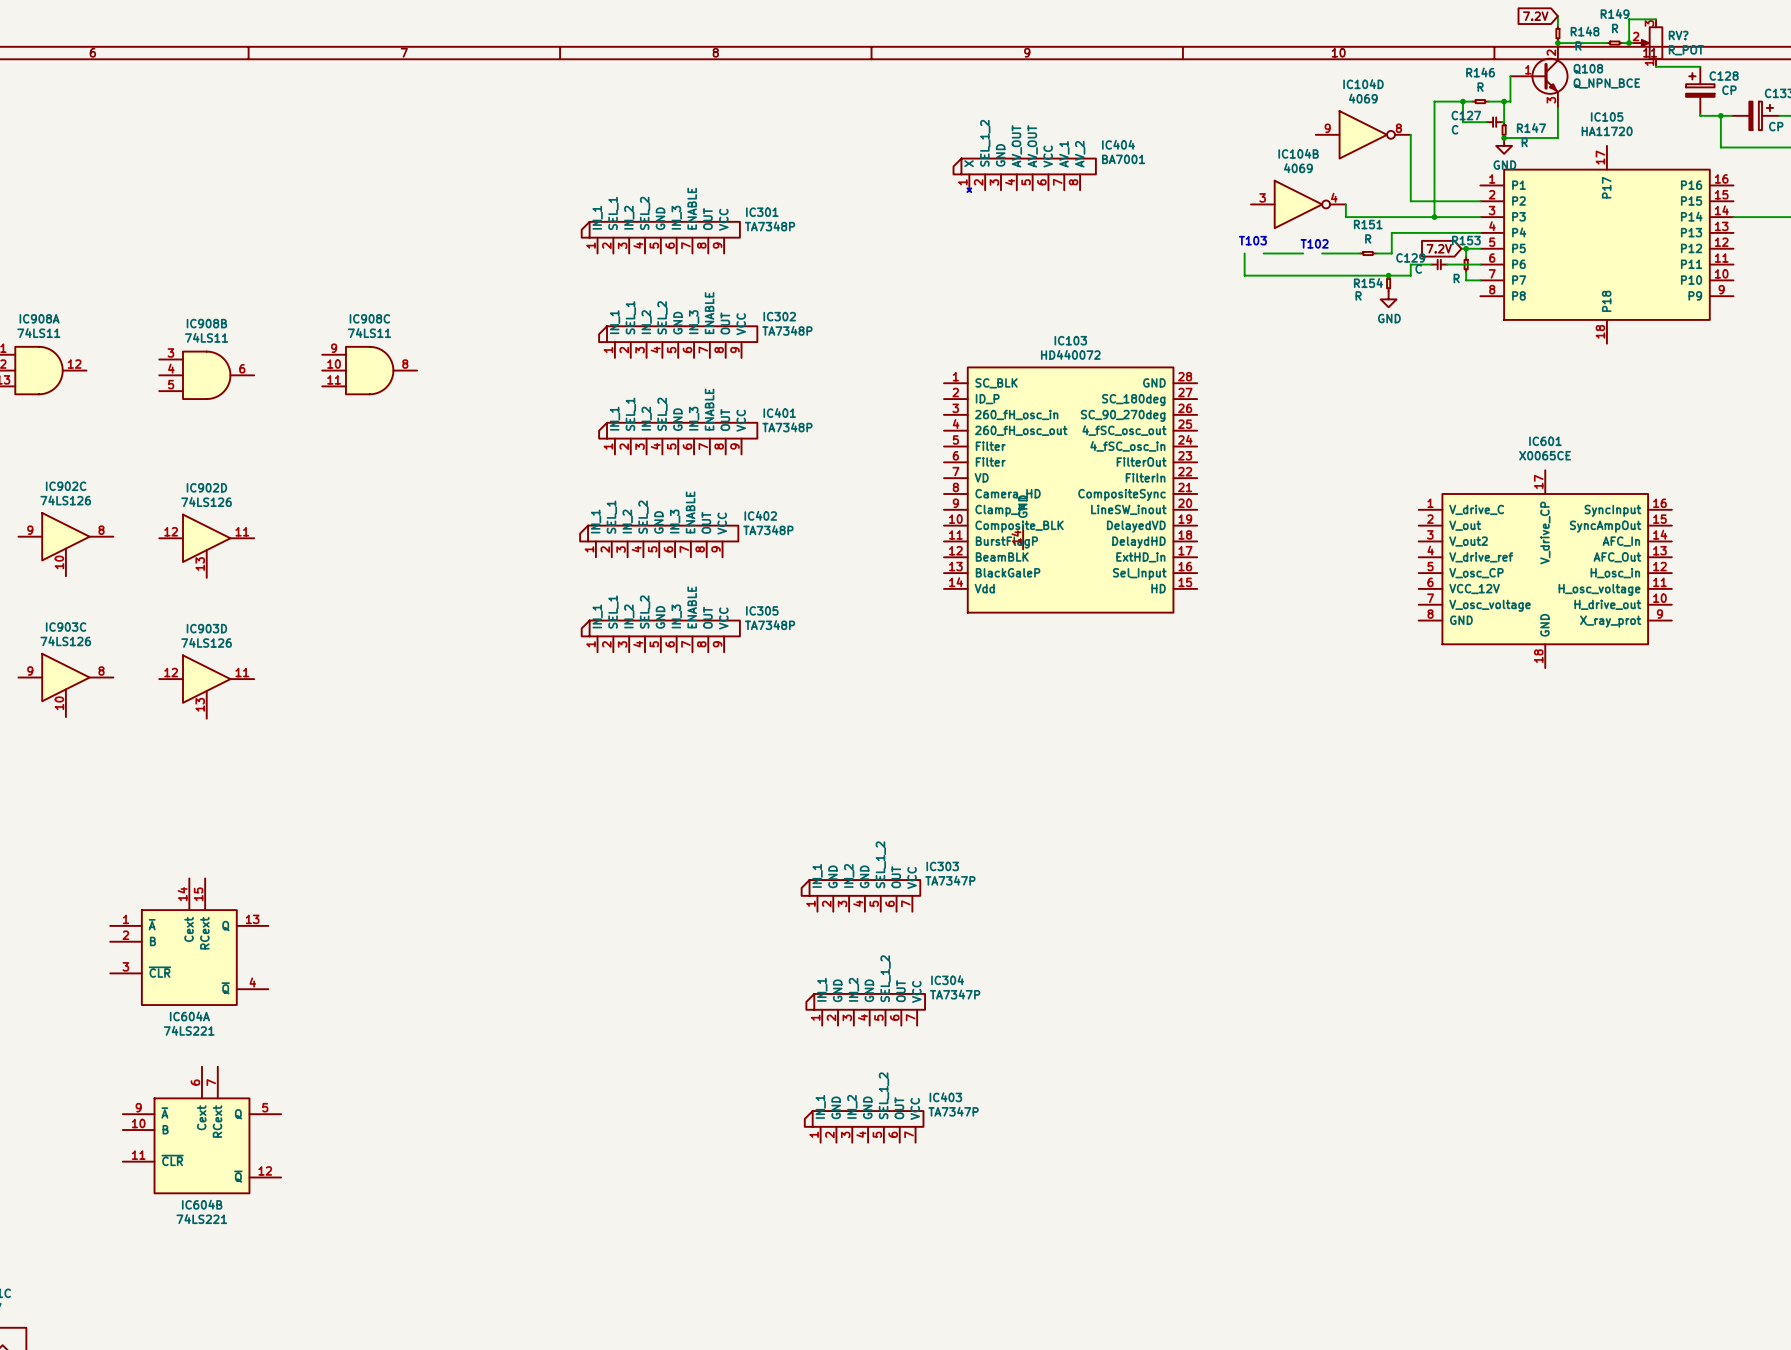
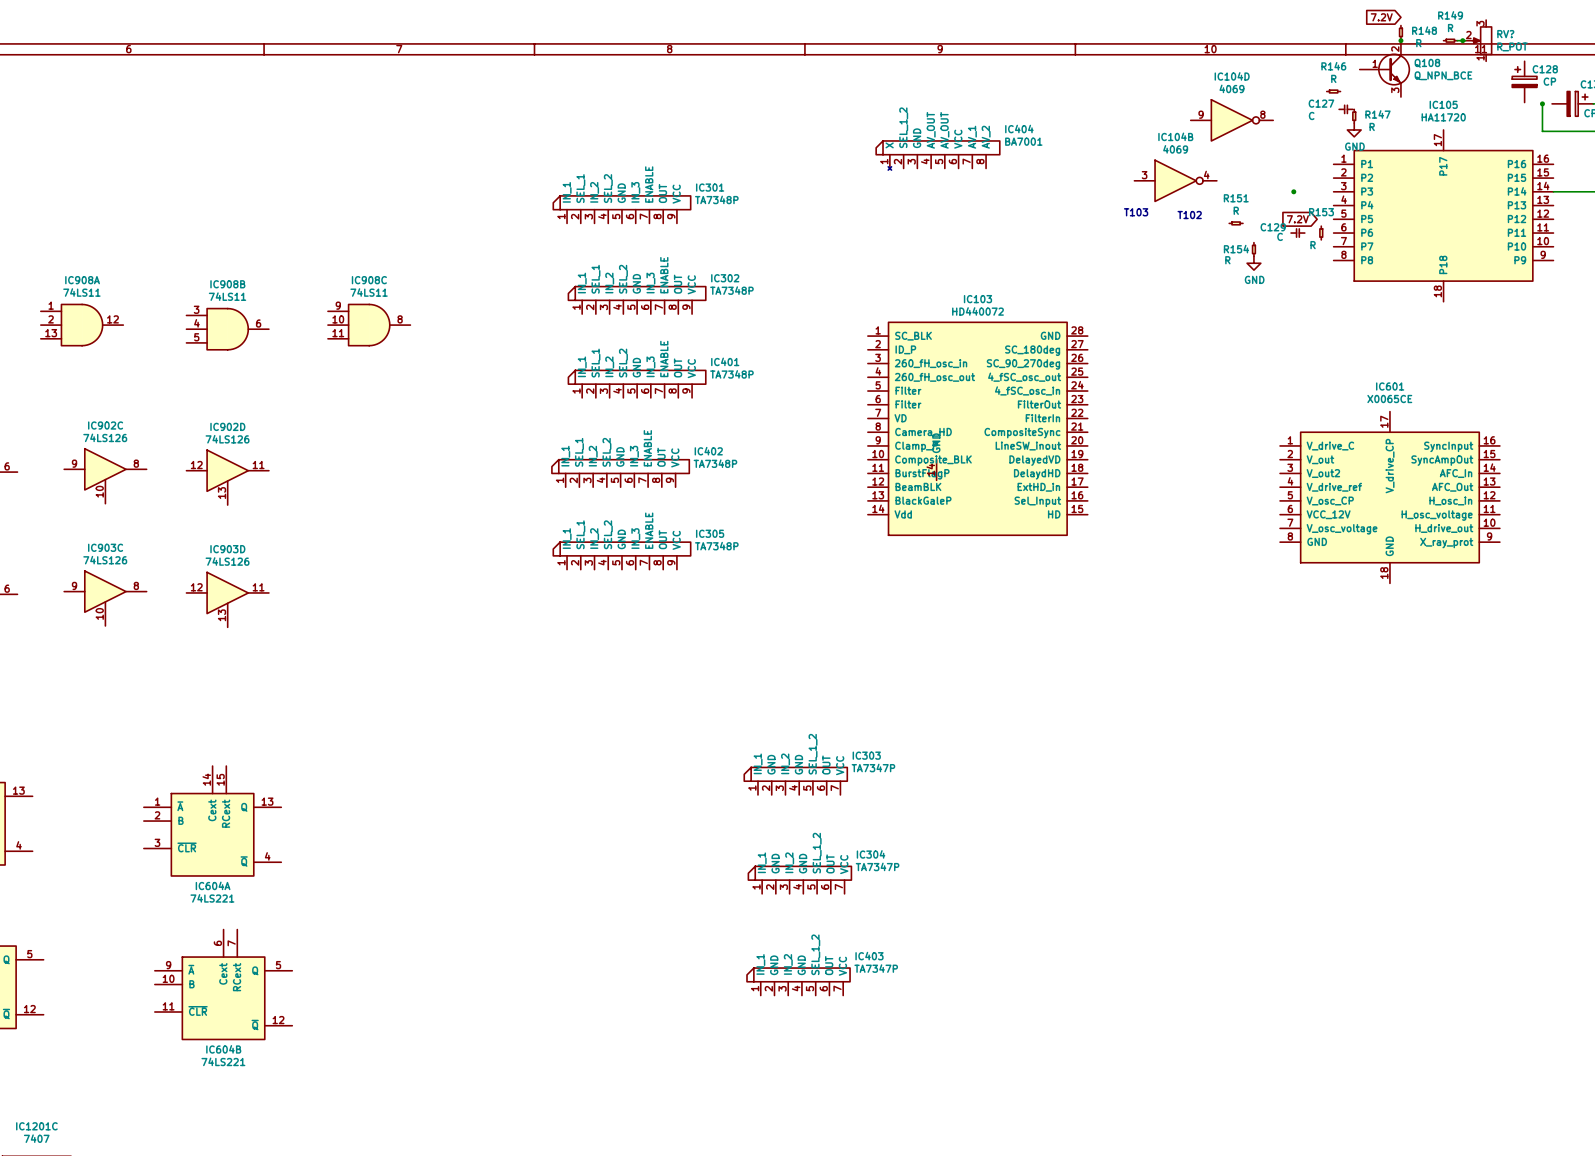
wire: (1557, 16) (1557, 25) -> none
wire: (1656, 19) (1629, 19) (1629, 43) -> none
wire: (1557, 43) (1606, 43) -> none
wire: (1656, 66) (1700, 66) -> none
wire: (1510, 76) (1510, 101) (1488, 101) -> none
wire: (1462, 101) (1462, 122) (1486, 122) -> none
junction: (1462, 101) -> none
wire: (1472, 101) (1434, 101) (1434, 217) -> none
wire: (1504, 101) (1504, 122) (1502, 122) -> none
junction: (1504, 101) -> none
wire: (1557, 107) (1557, 137) (1504, 137) -> none
wire: (1700, 114) (1700, 115) (1731, 115) -> none
wire: (1410, 134) (1410, 201) (1480, 201) -> none
junction: (1504, 137) -> none
wire: (1345, 204) (1345, 217) (1480, 217) -> none
wire: (1480, 232) (1391, 232) (1391, 253) (1375, 253) -> none
wire: (1461, 248) (1480, 248) -> none
wire: (1466, 248) (1466, 256) -> none
junction: (1466, 248) -> none
wire: (1244, 253) (1244, 275) (1410, 275) (1410, 264) (1431, 264) -> none
wire: (1263, 253) (1303, 253) -> none
wire: (1322, 253) (1360, 253) -> none
wire: (1447, 264) (1480, 264) -> none
wire: (1466, 272) (1466, 280) (1480, 280) -> none
junction: (1388, 275) -> none

